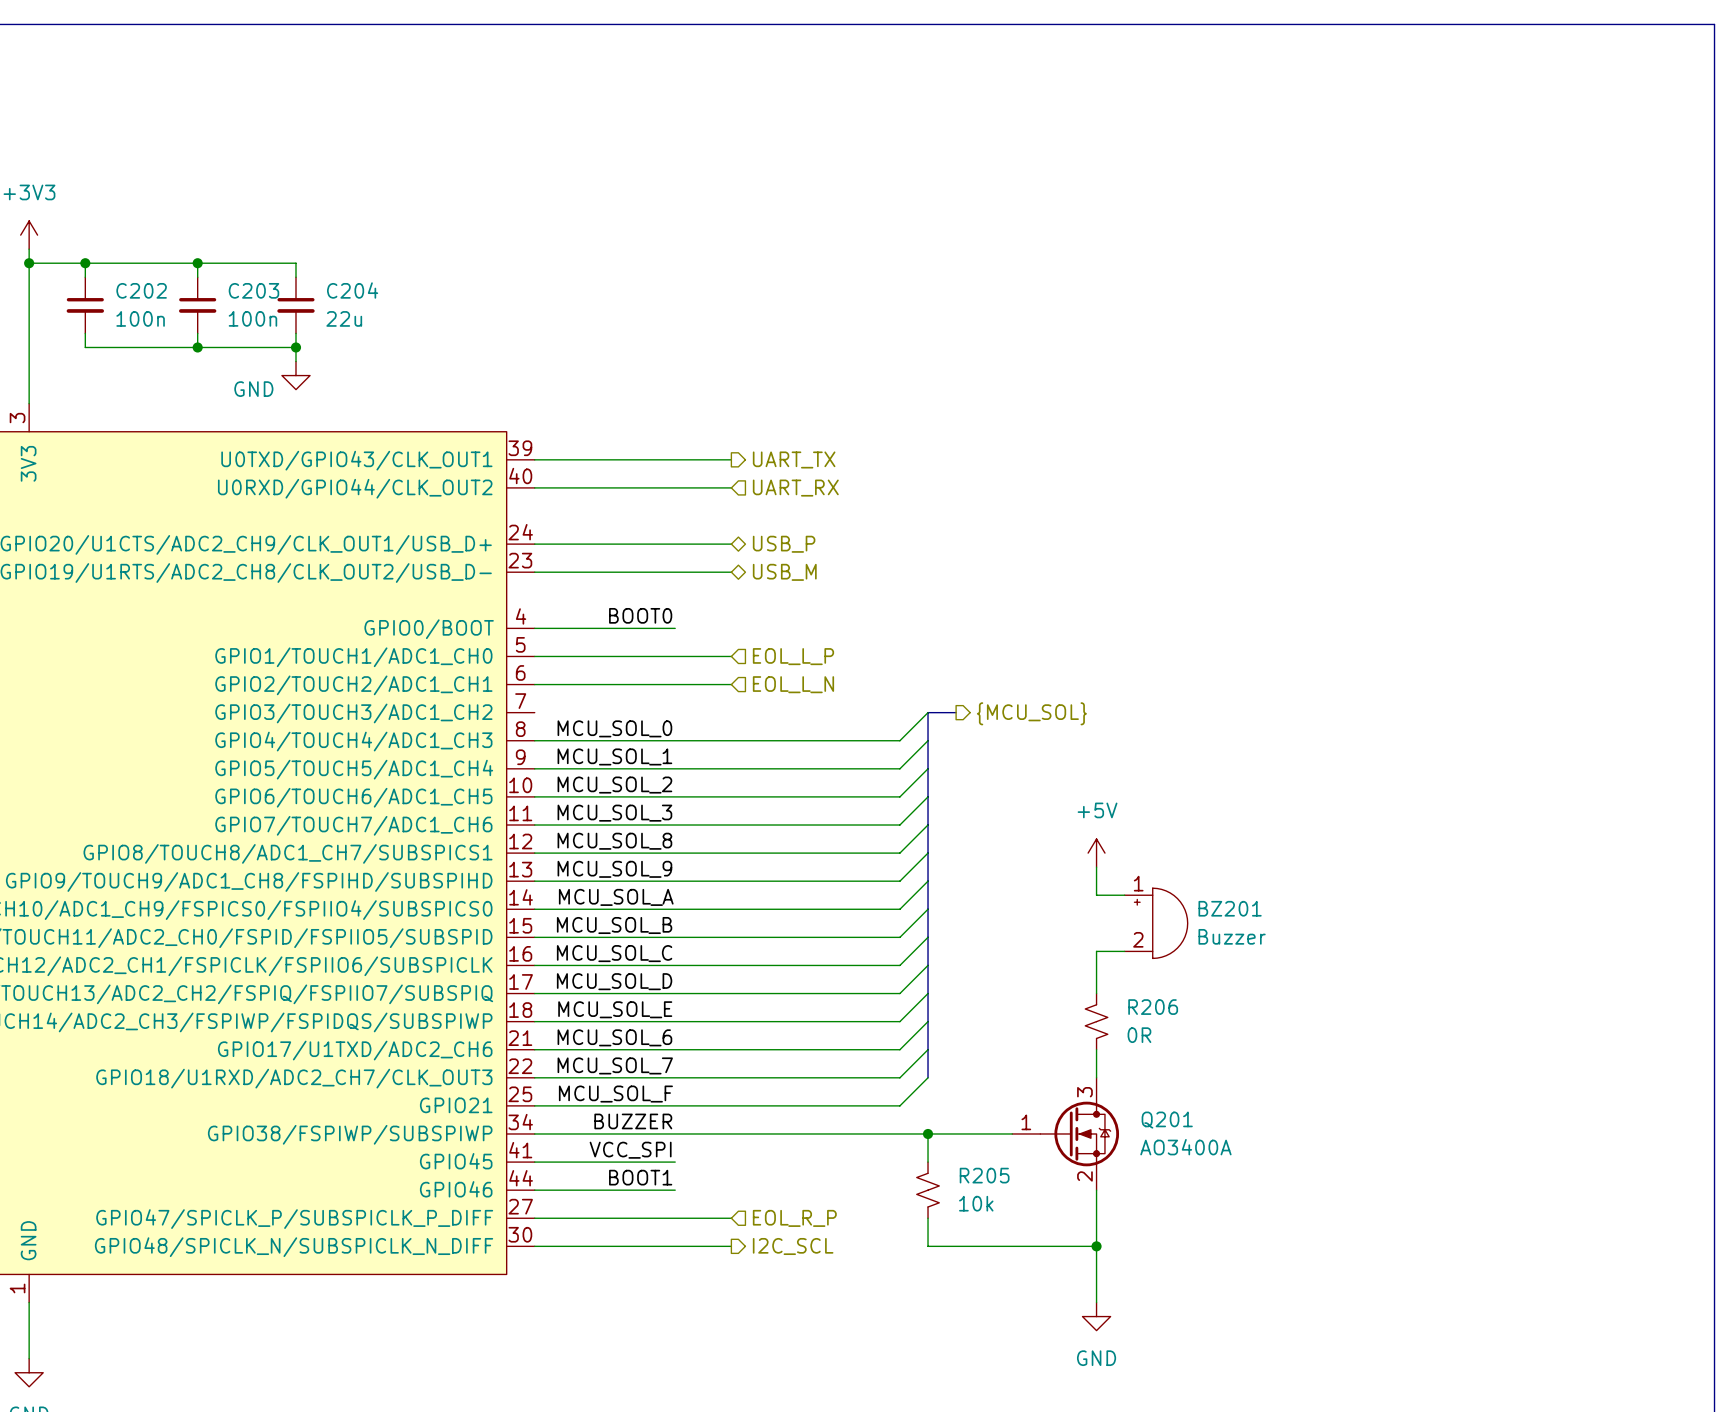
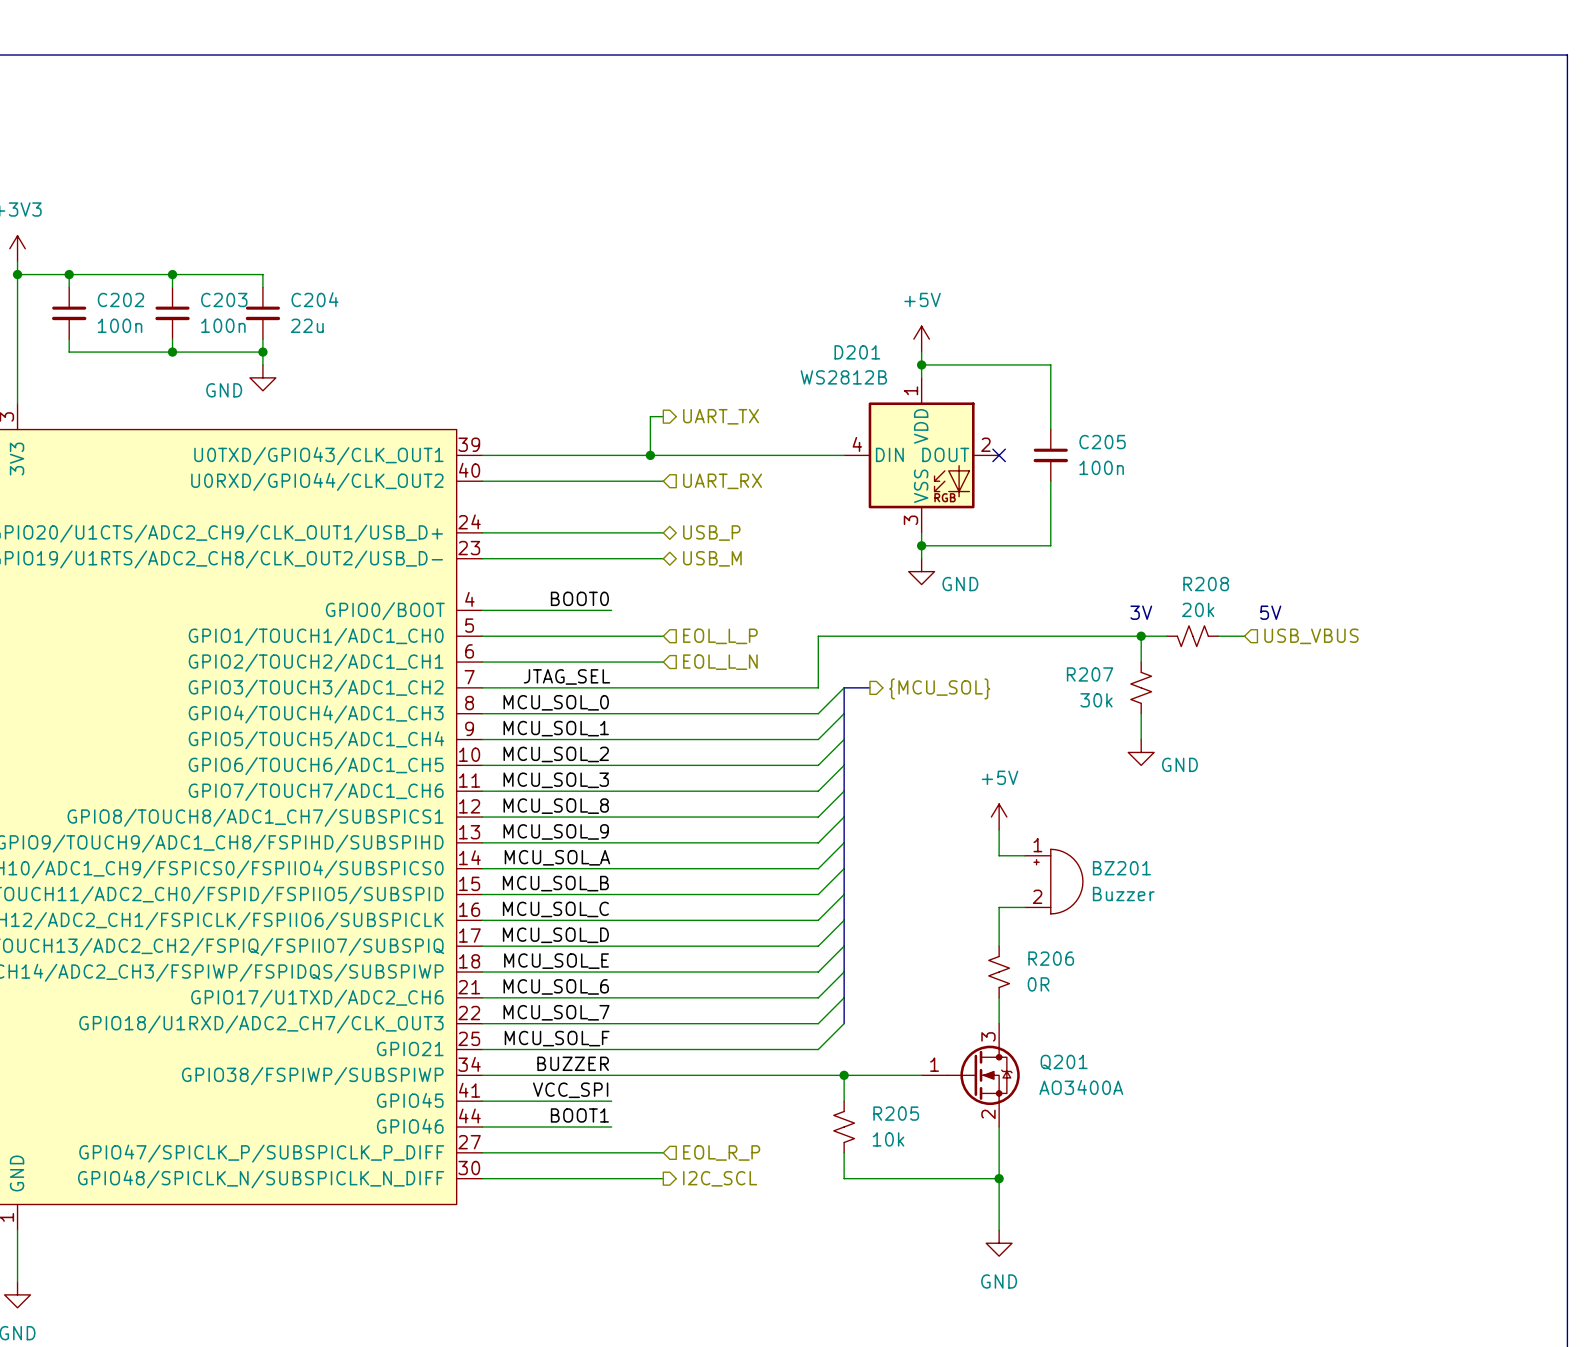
power symbol: none -> +5V (921, 339)
wire: none -> (921, 352) (921, 377)
wire: none -> (921, 364) (1050, 364) (1050, 429)
junction: none -> (921, 364)
wire: none -> (663, 416) (650, 416) (650, 455)
junction: none -> (650, 455)
wire: none -> (663, 455) (844, 455)
hierarchical label position: UART_TX (794, 459) -> UART_TX (721, 416)
D201: none -> WS2812B (921, 455)
no-connect mark: none -> (999, 455)
C205: none -> 100n (1050, 455)
wire: none -> (1050, 481) (1050, 545) (921, 545)
wire: none -> (921, 532) (921, 558)
junction: none -> (921, 545)
power symbol: none -> GND (921, 571)
text: none -> 3V (1141, 612)
text: none -> 5V (1270, 612)
wire: none -> (1141, 636) (1141, 662)
junction: none -> (1141, 636)
wire: none -> (1167, 636) (818, 636) (818, 687) (482, 687)
R208: none -> 20k (1192, 636)
wire: none -> (1218, 636) (1244, 636)
hierarchical label: none -> USB_VBUS (1311, 636)
label: none -> JTAG_SEL (566, 676)
R207: none -> 30k (1141, 687)
wire: none -> (1141, 713) (1141, 739)
power symbol: none -> GND (1141, 752)

